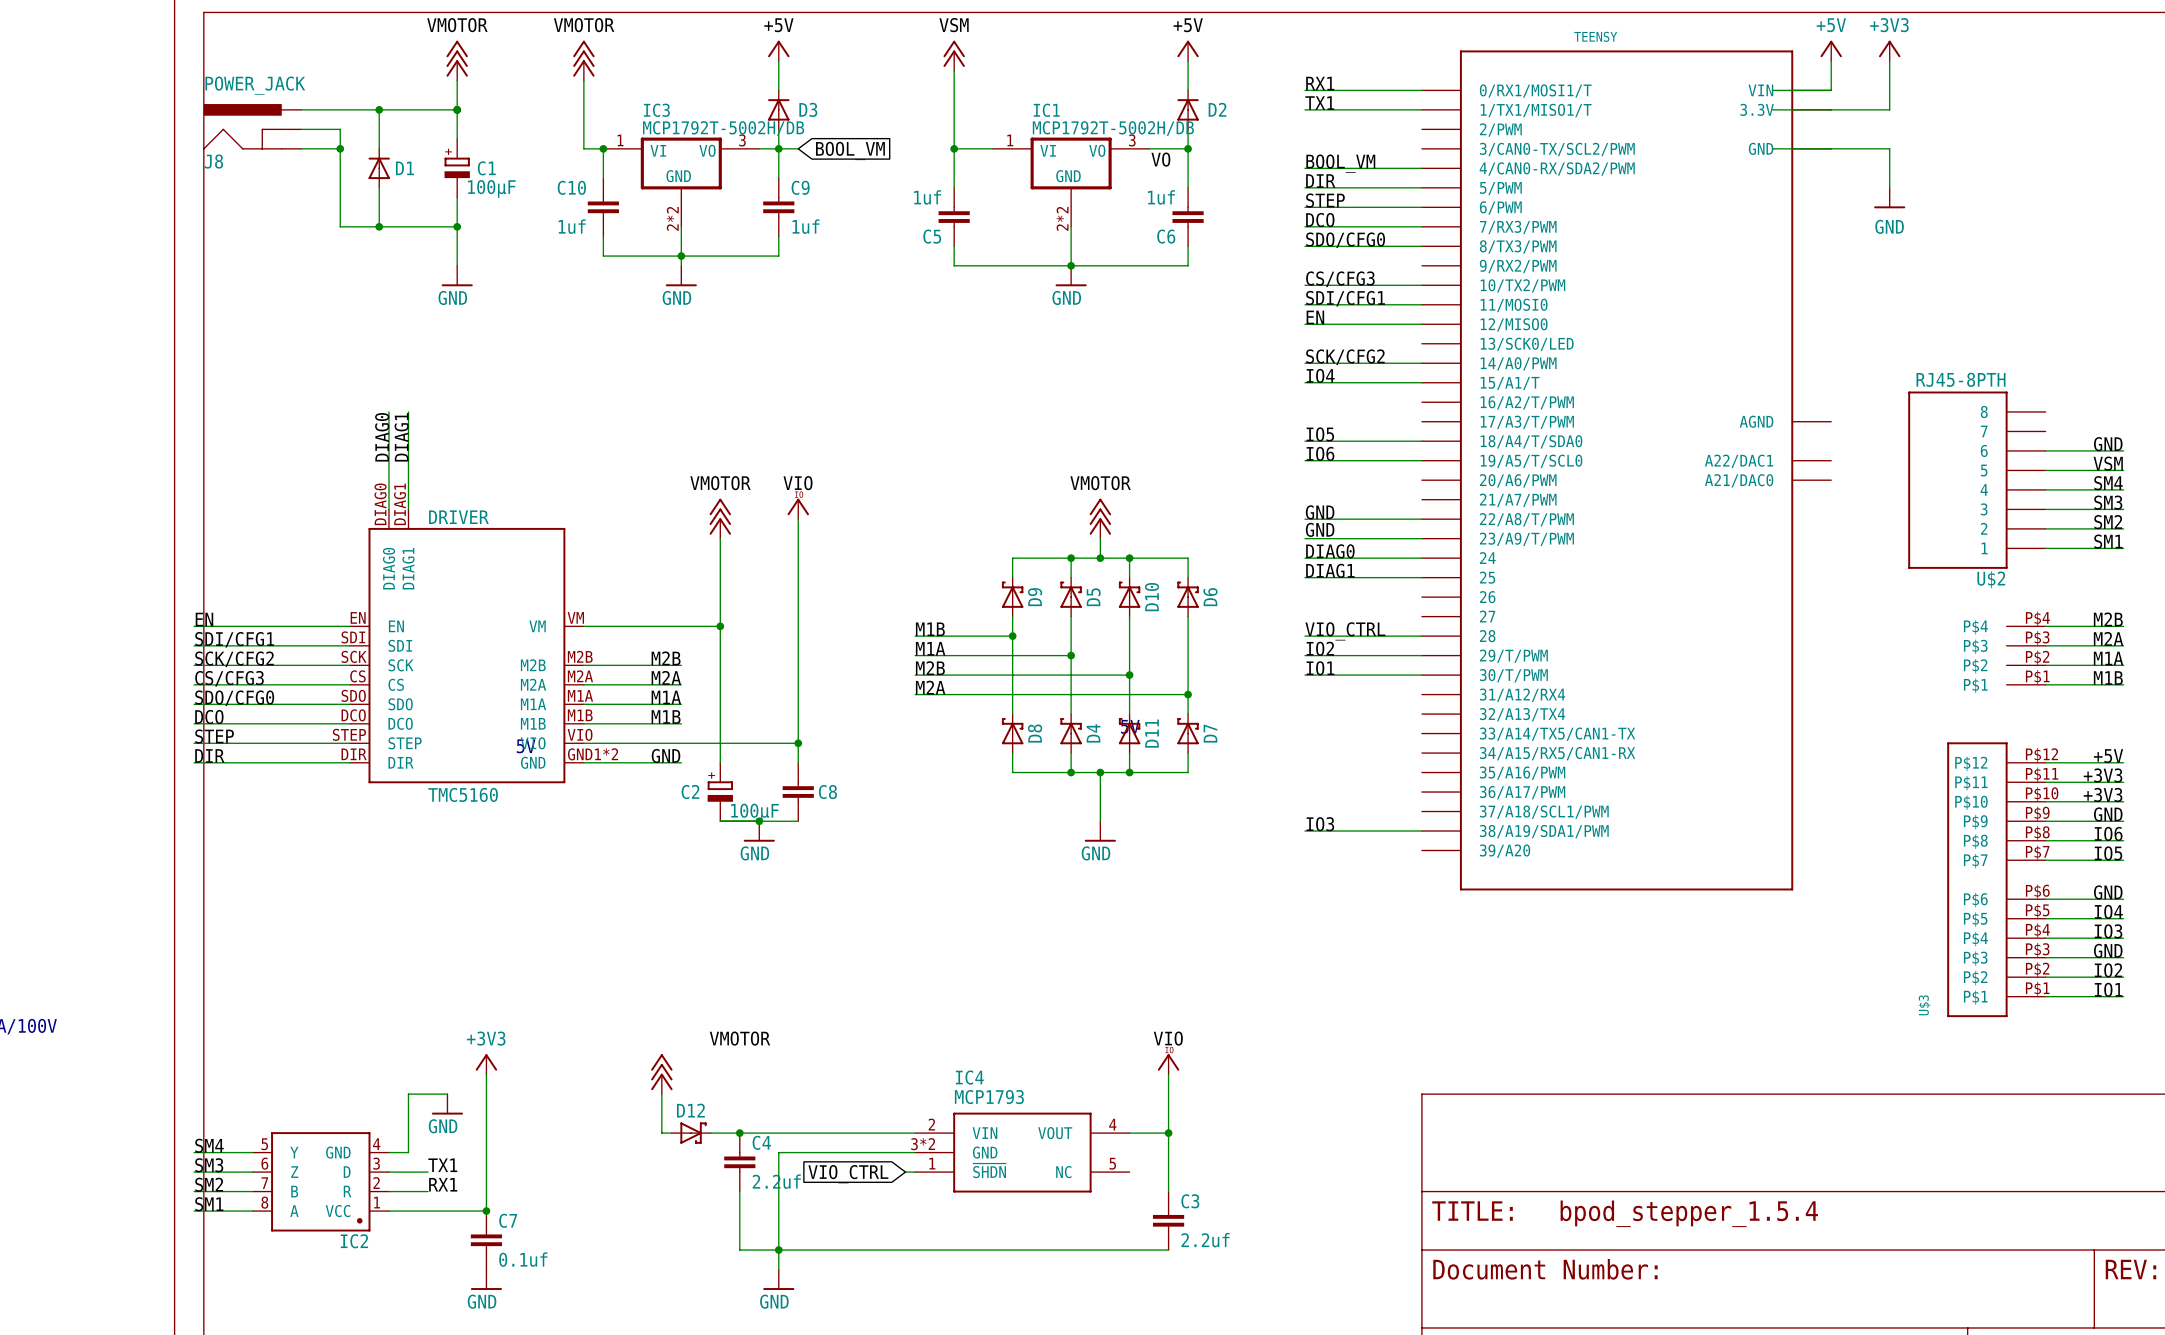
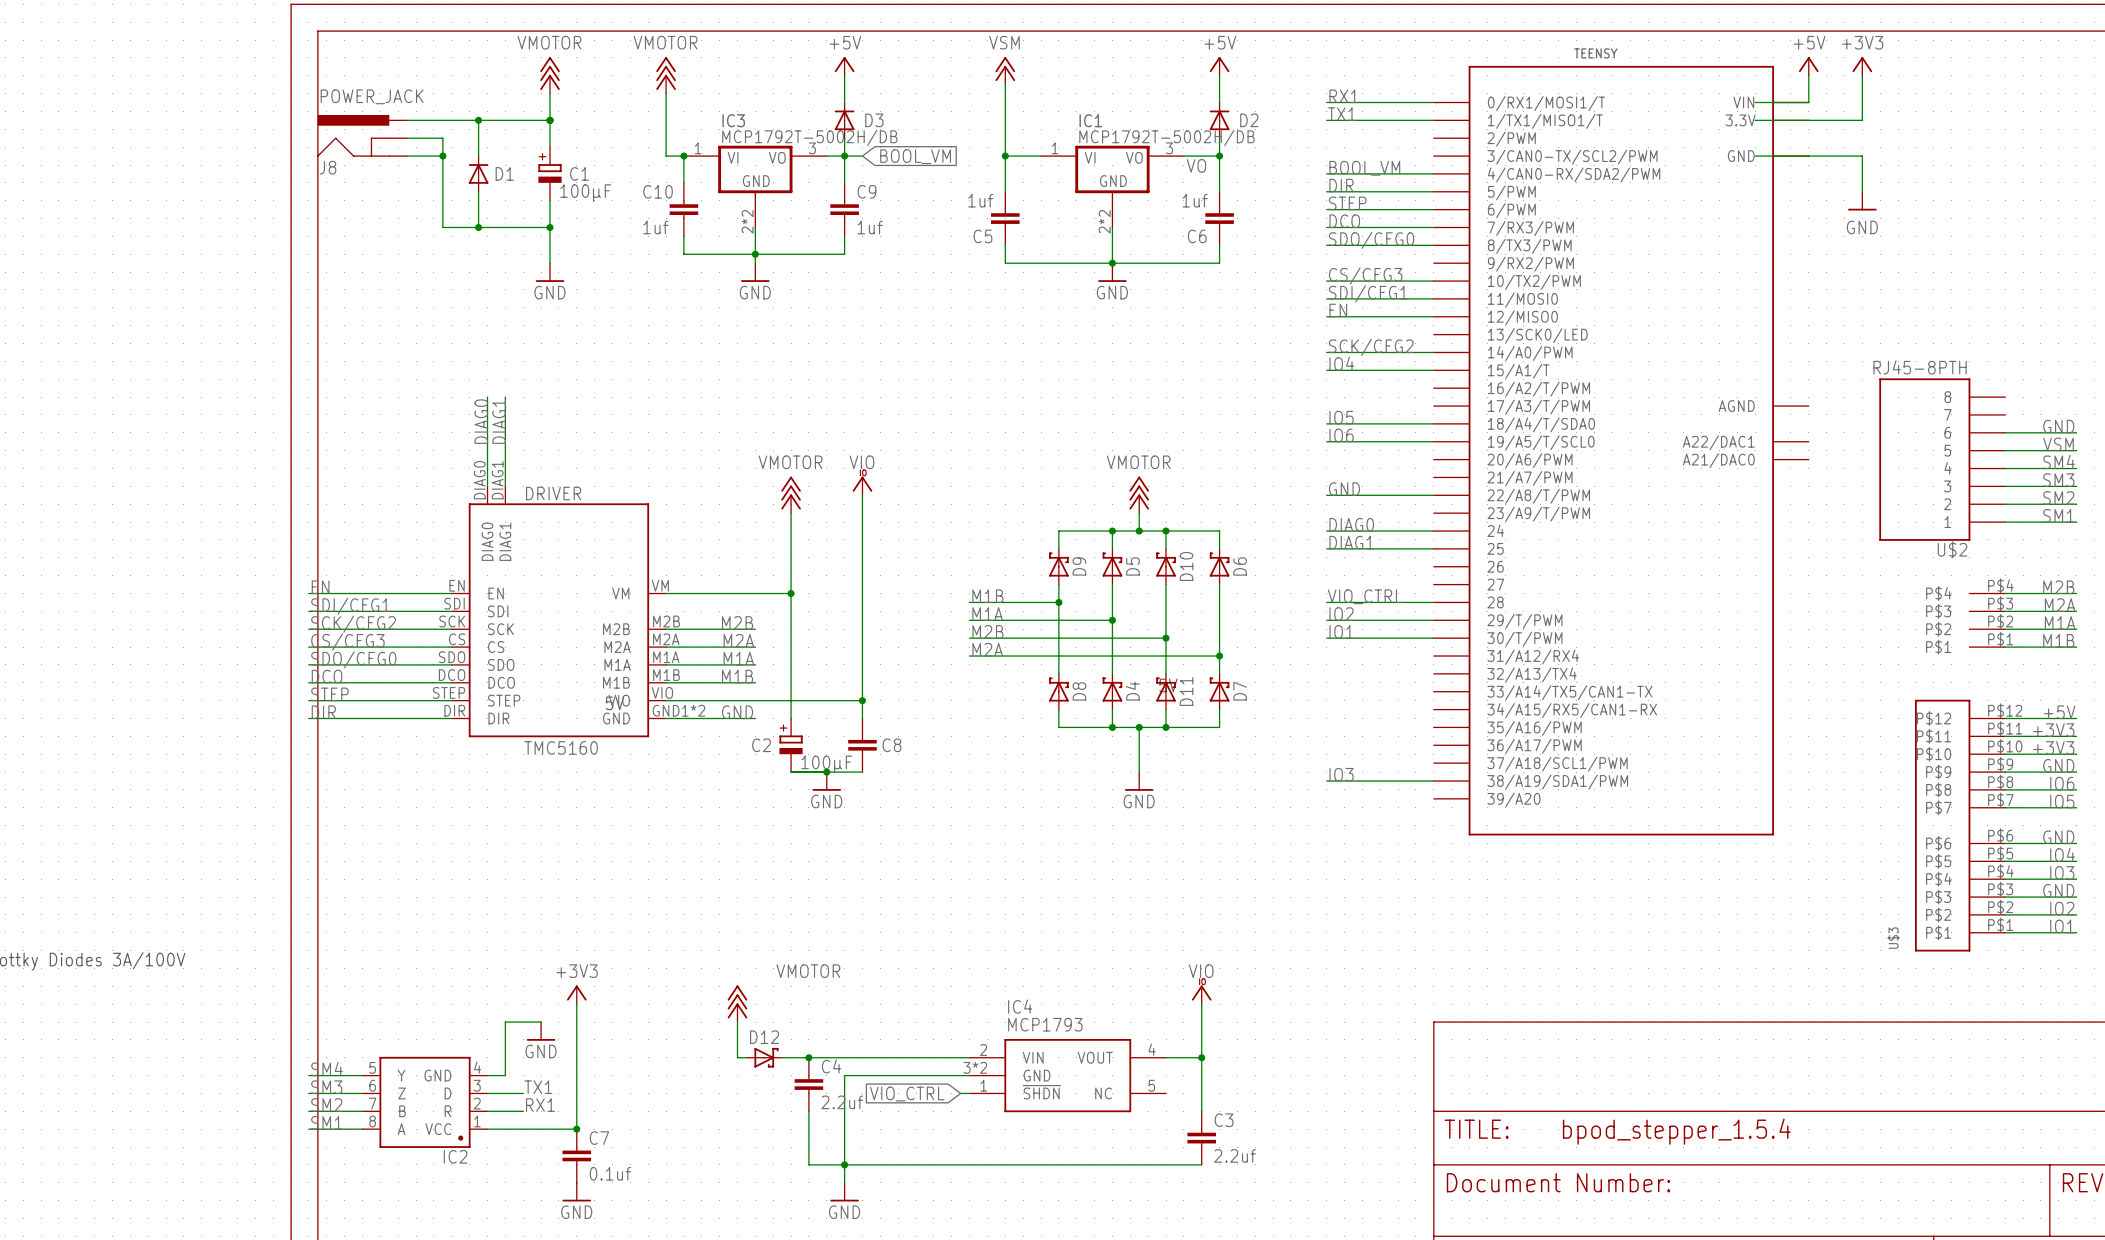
label: GND (1320, 529) -> none
wire: (1305, 538) (1421, 538) -> none

